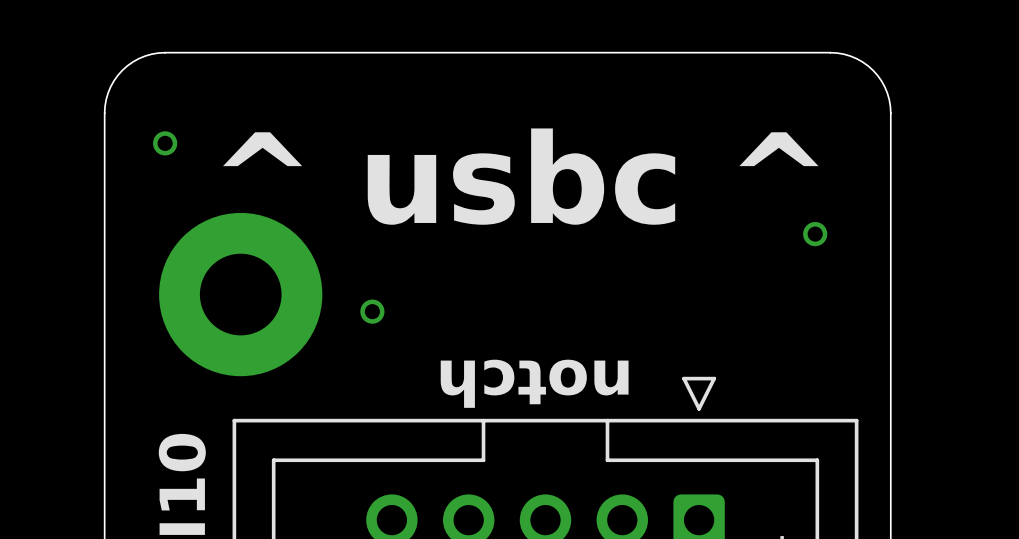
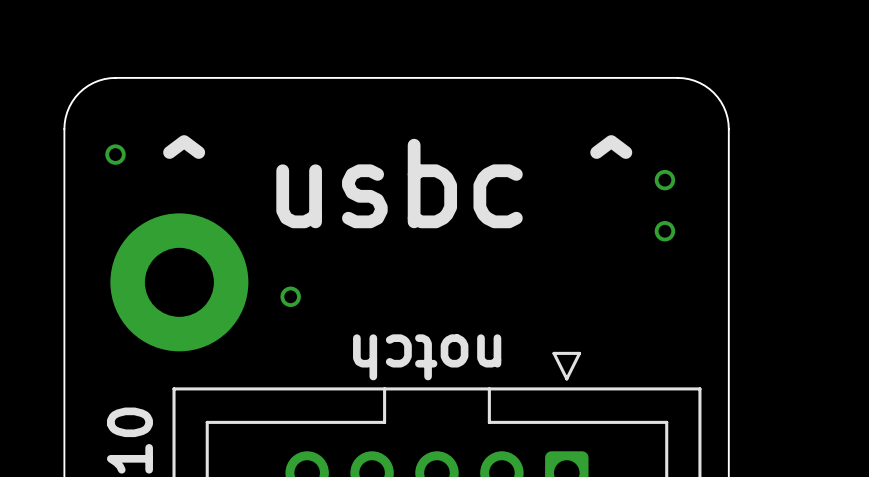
via: none -> (664, 180)

